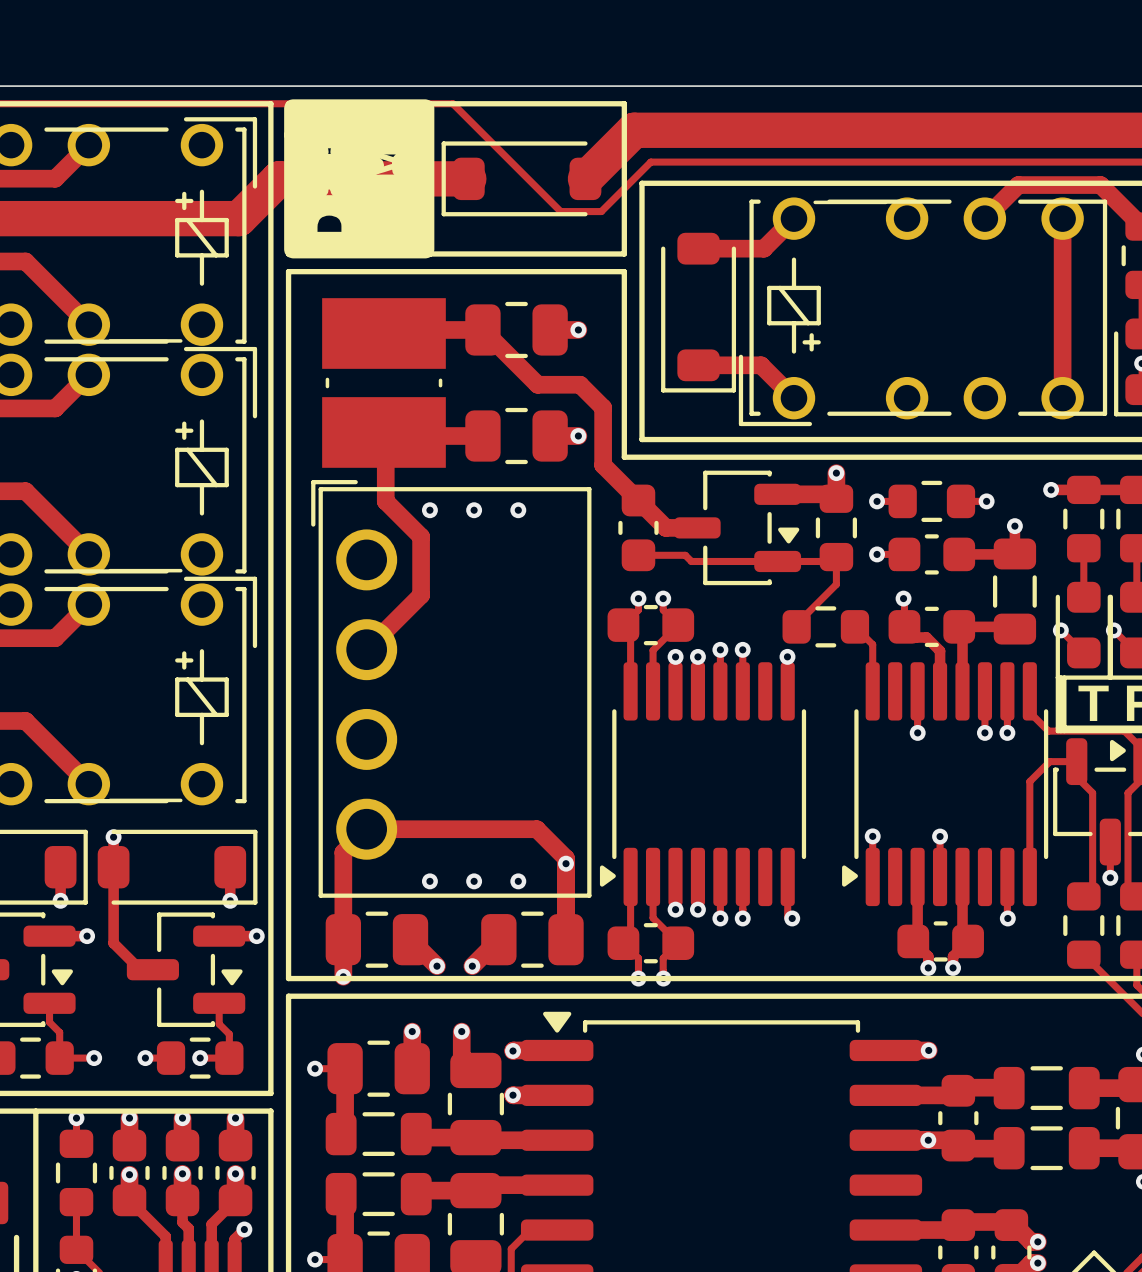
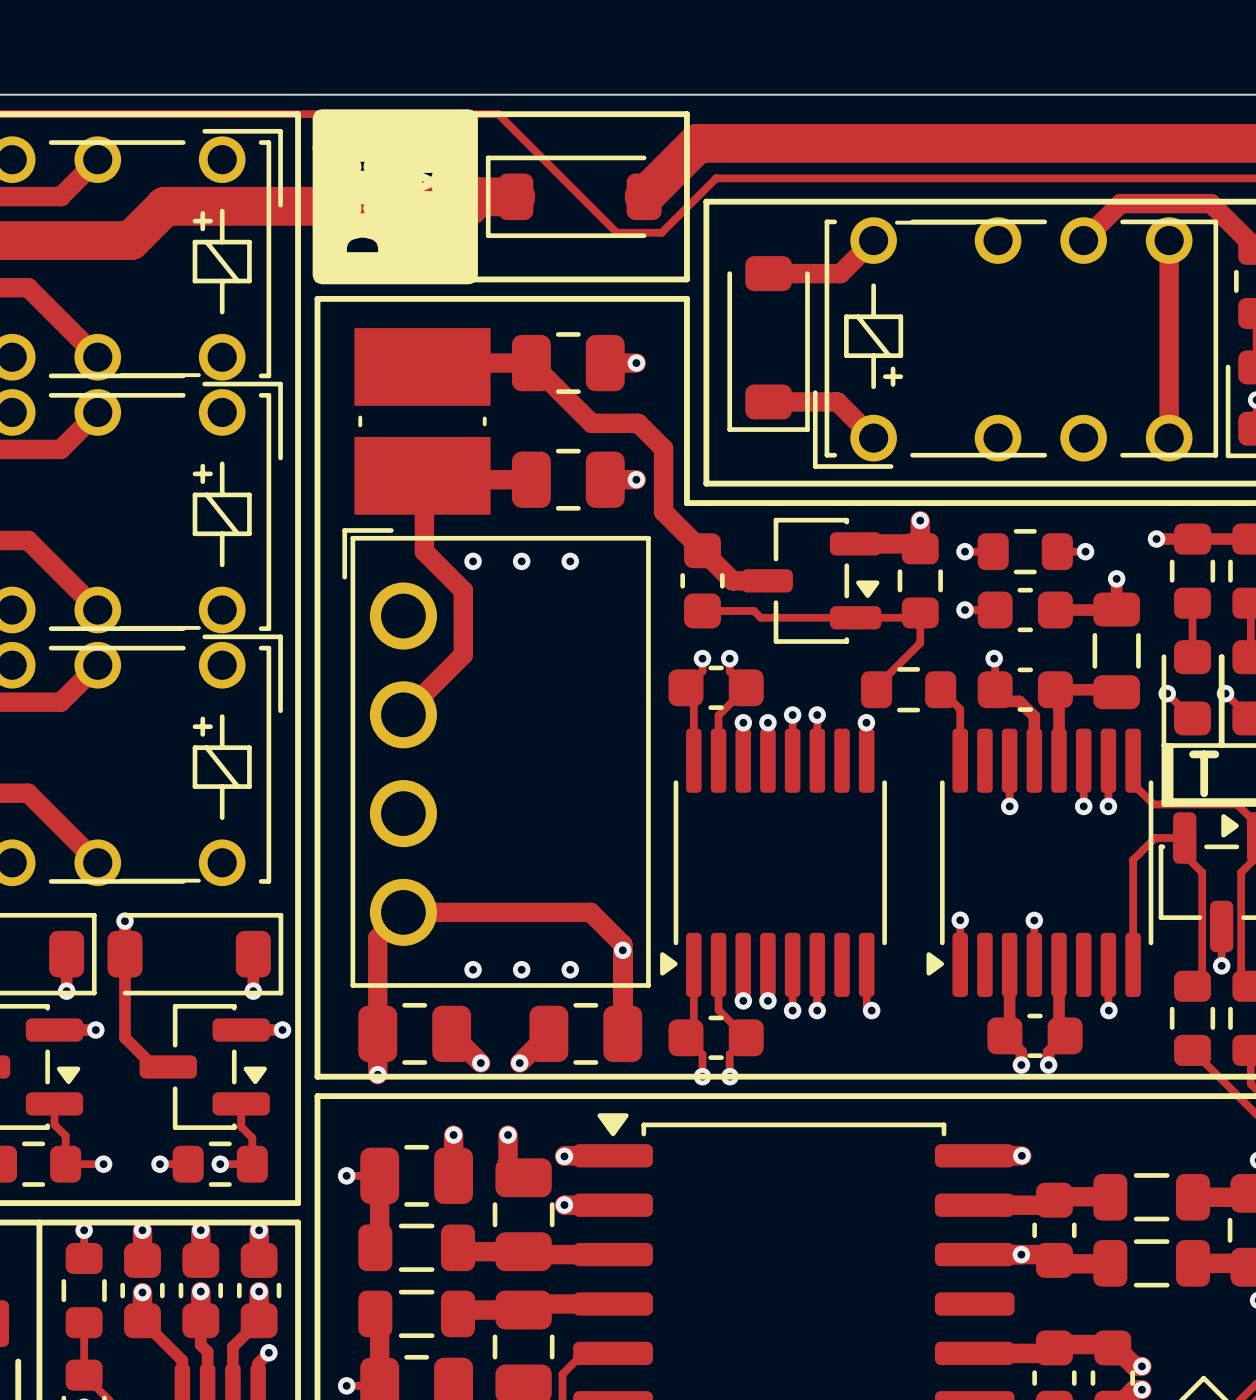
track: (434, 178) (278, 178) (239, 218) (118, 218) -> (477, 196) (468, 206) (165, 206) (130, 240)

